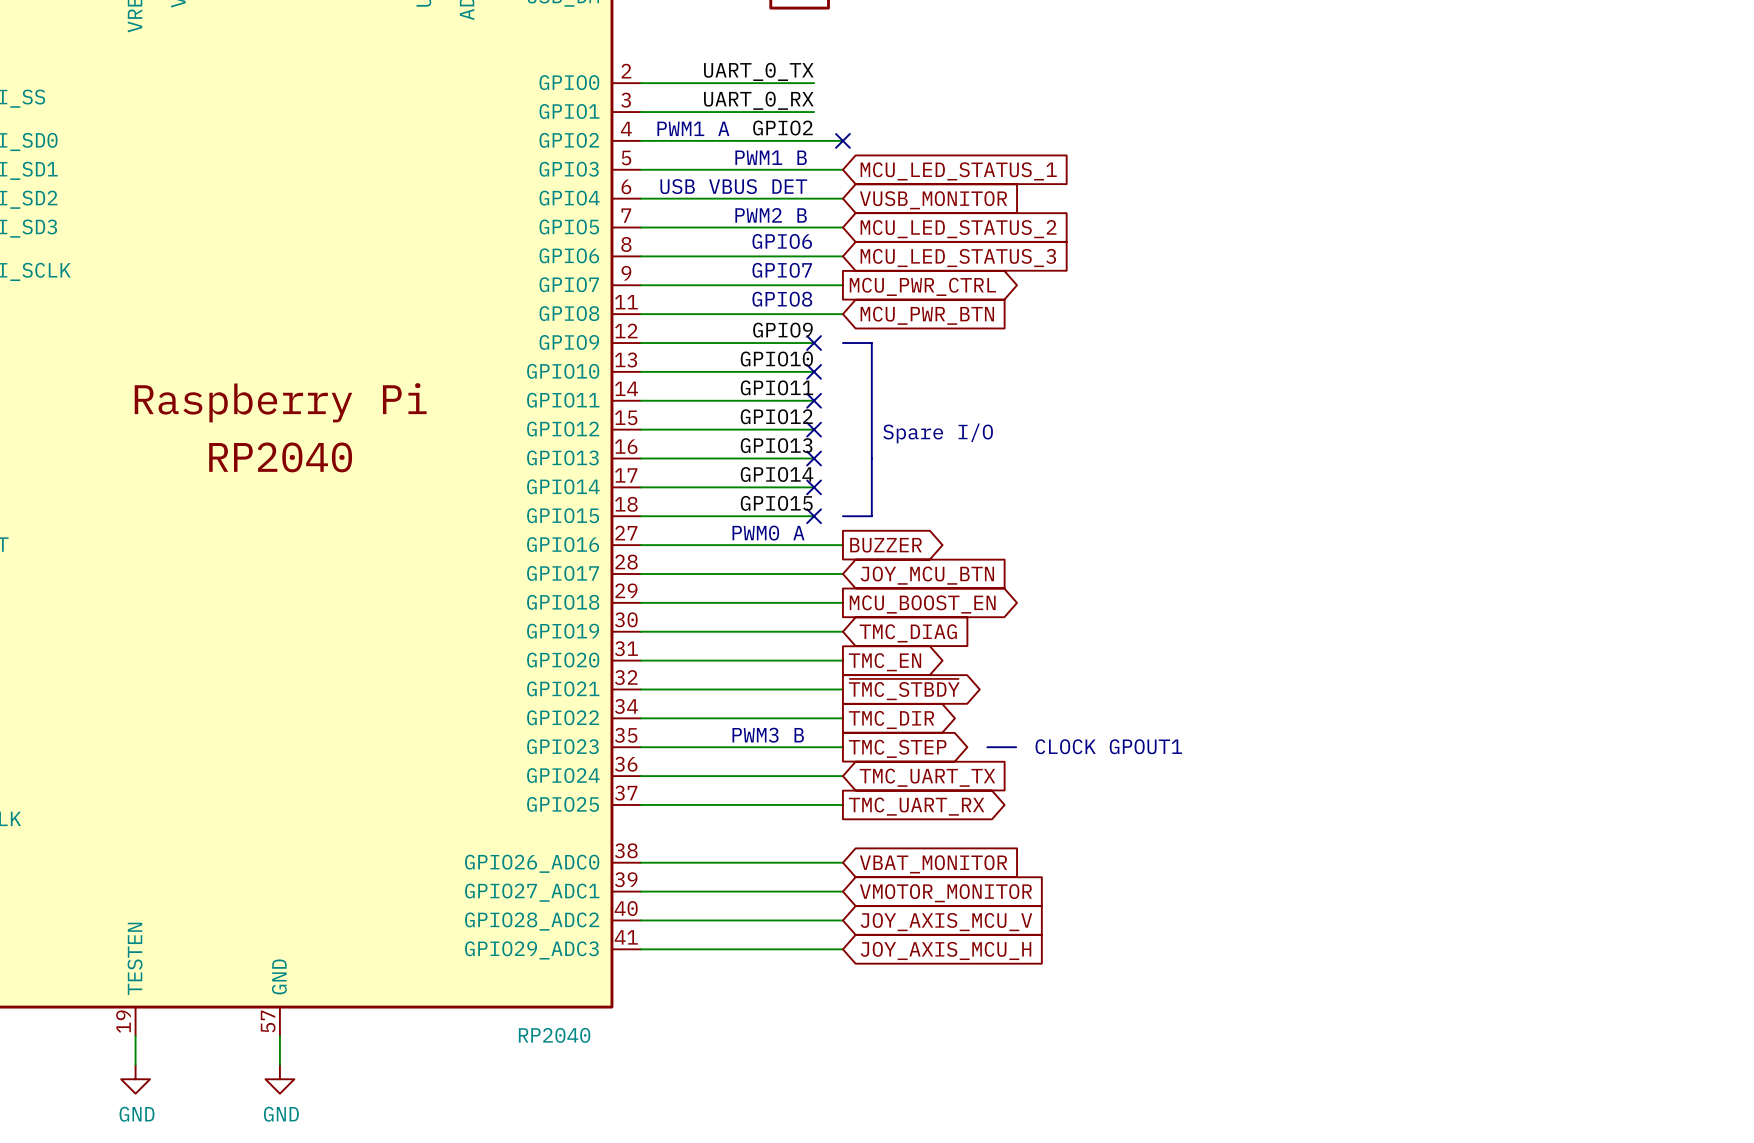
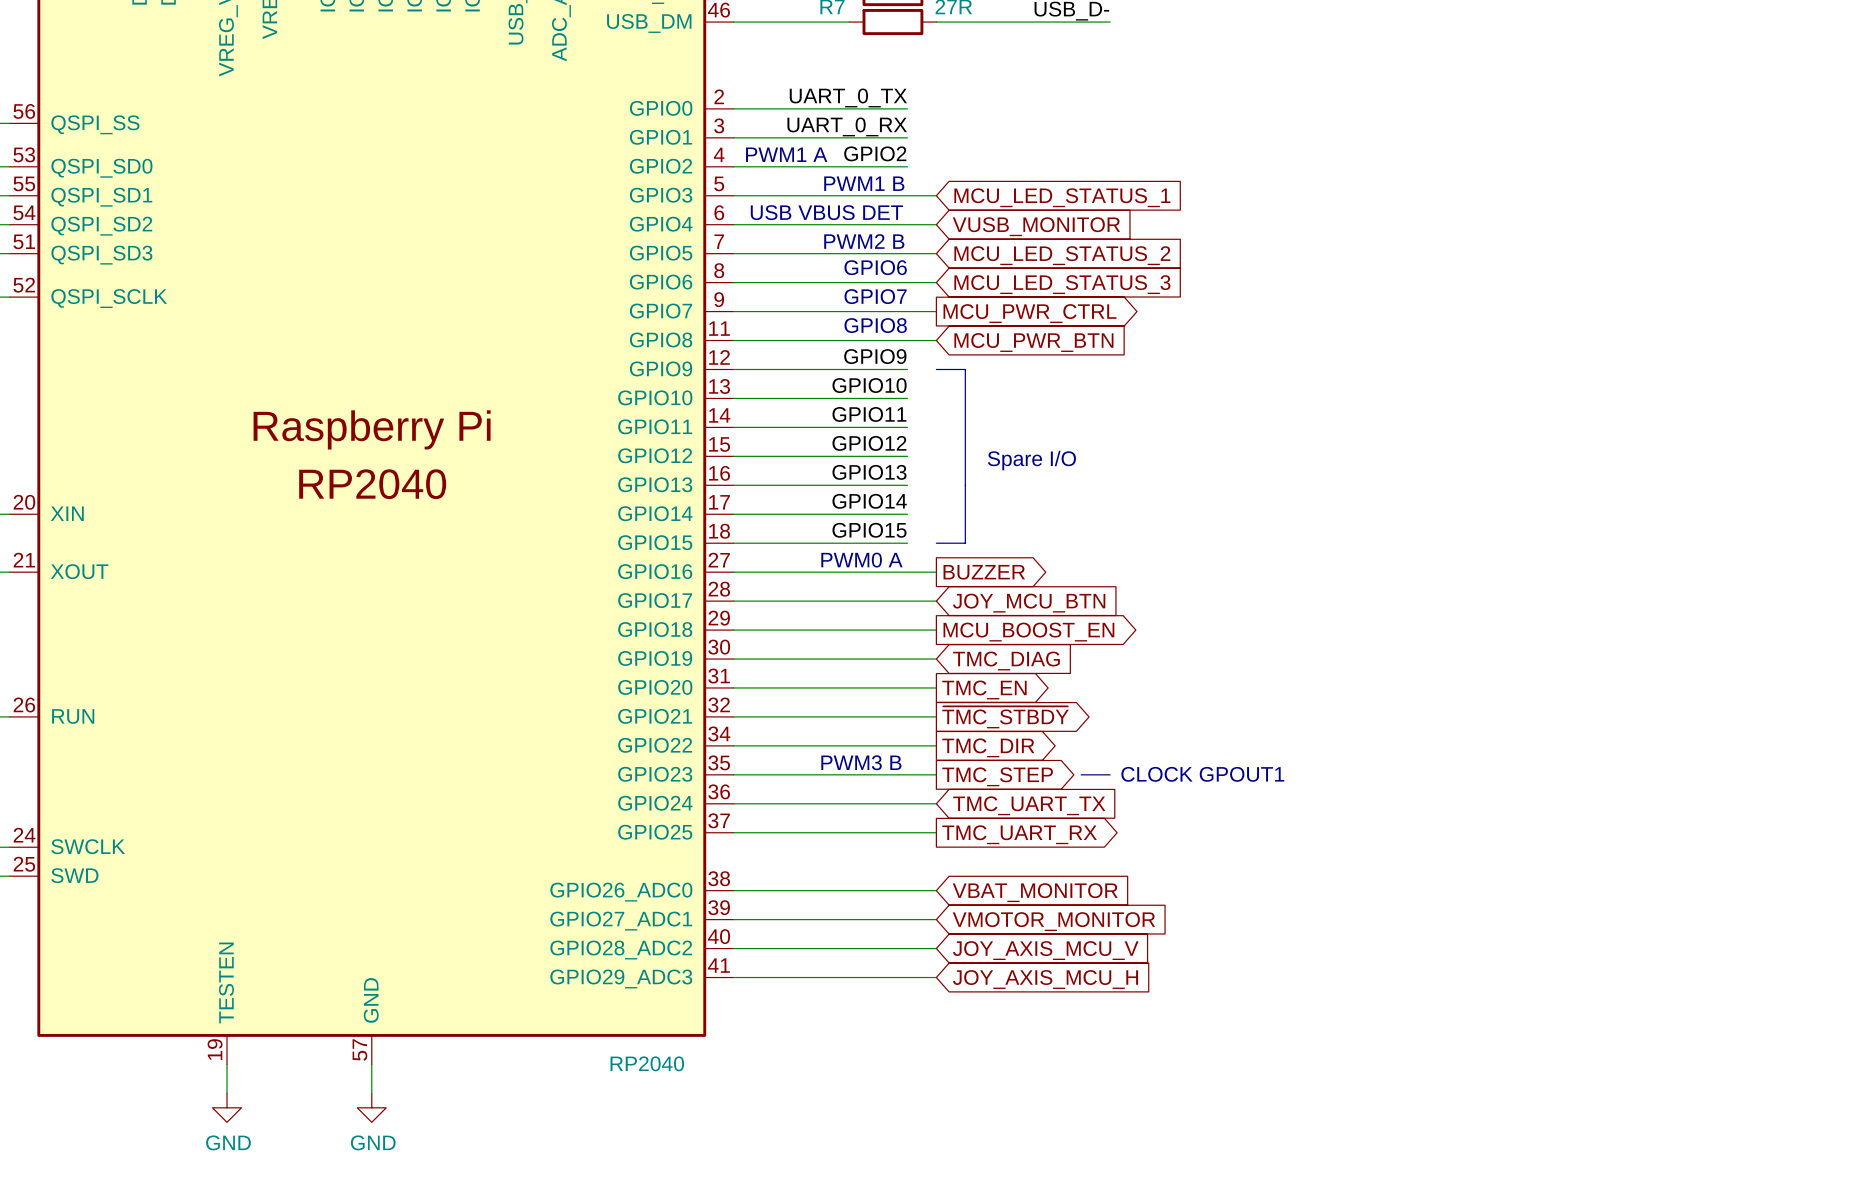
wire: (814, 140) (842, 140) -> none
no-connect mark: (842, 140) -> none
no-connect mark: (814, 343) -> none
no-connect mark: (814, 371) -> none
no-connect mark: (814, 400) -> none
no-connect mark: (814, 429) -> none
no-connect mark: (814, 458) -> none
no-connect mark: (814, 487) -> none
no-connect mark: (814, 516) -> none

